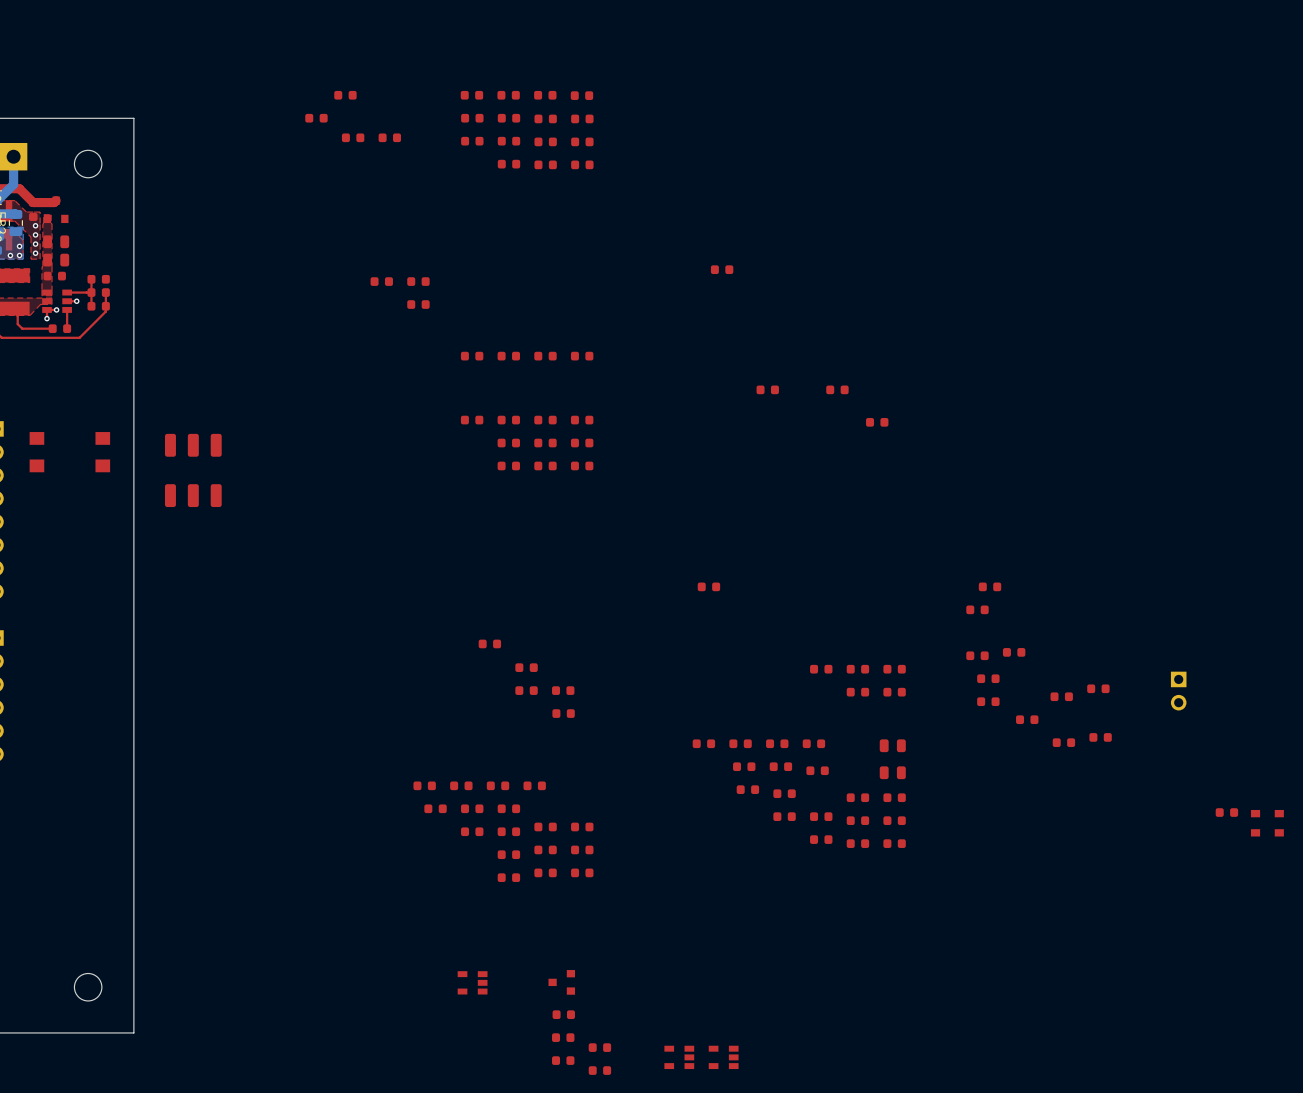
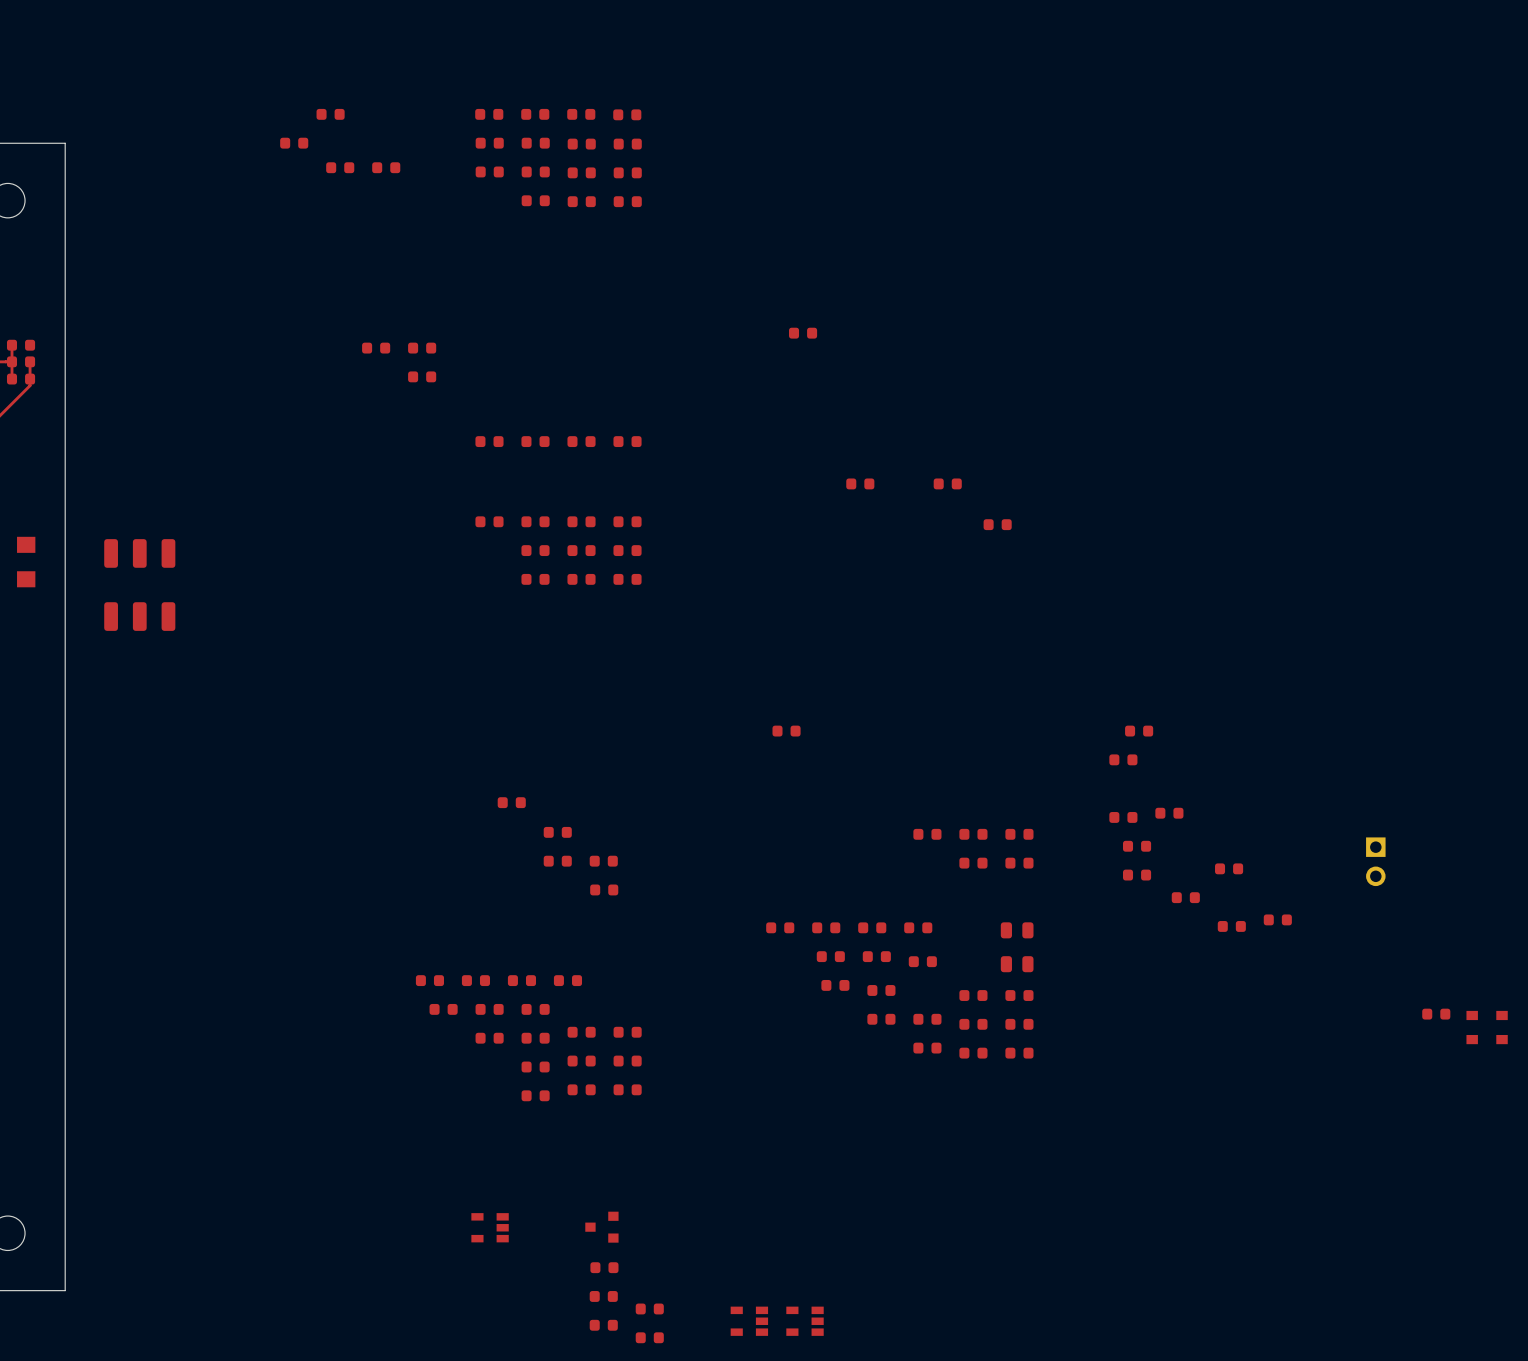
part: (1098, 688) -> none

